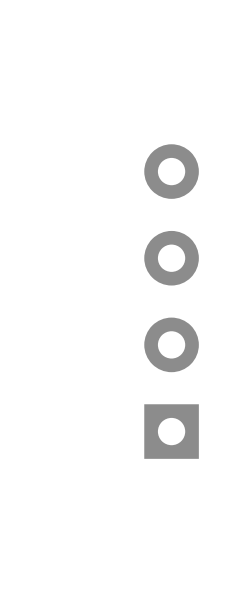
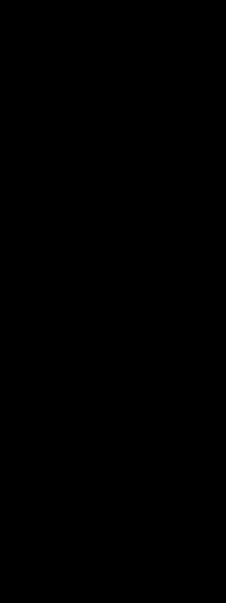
part: (171, 301) -> none

